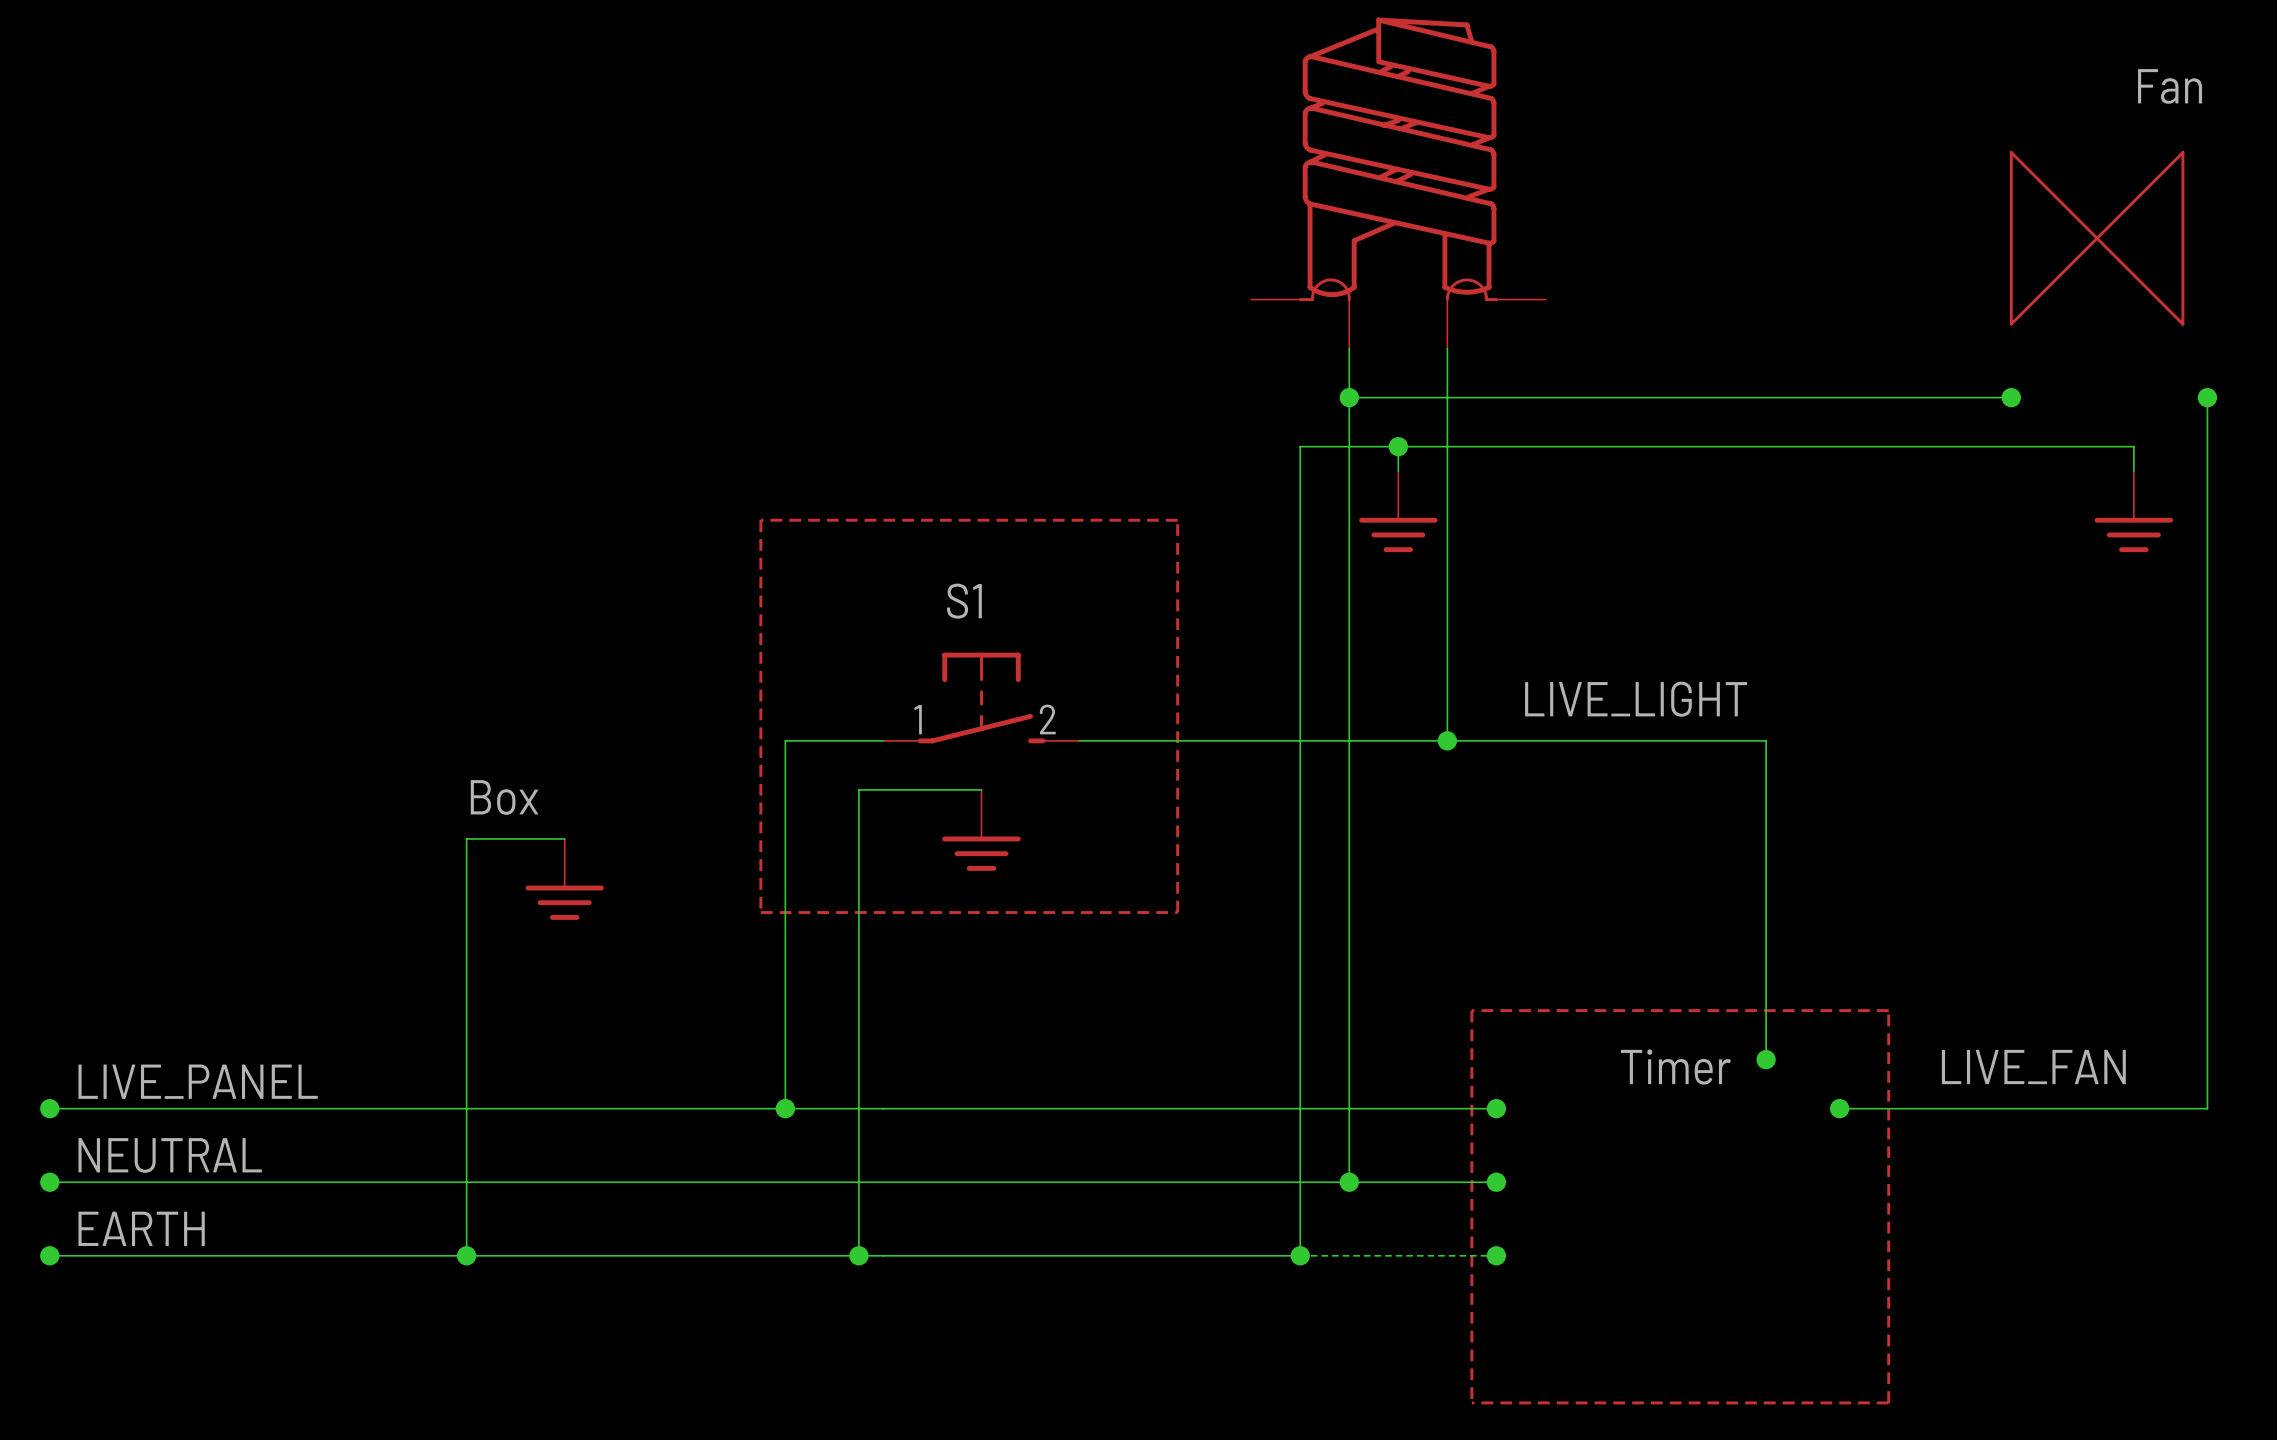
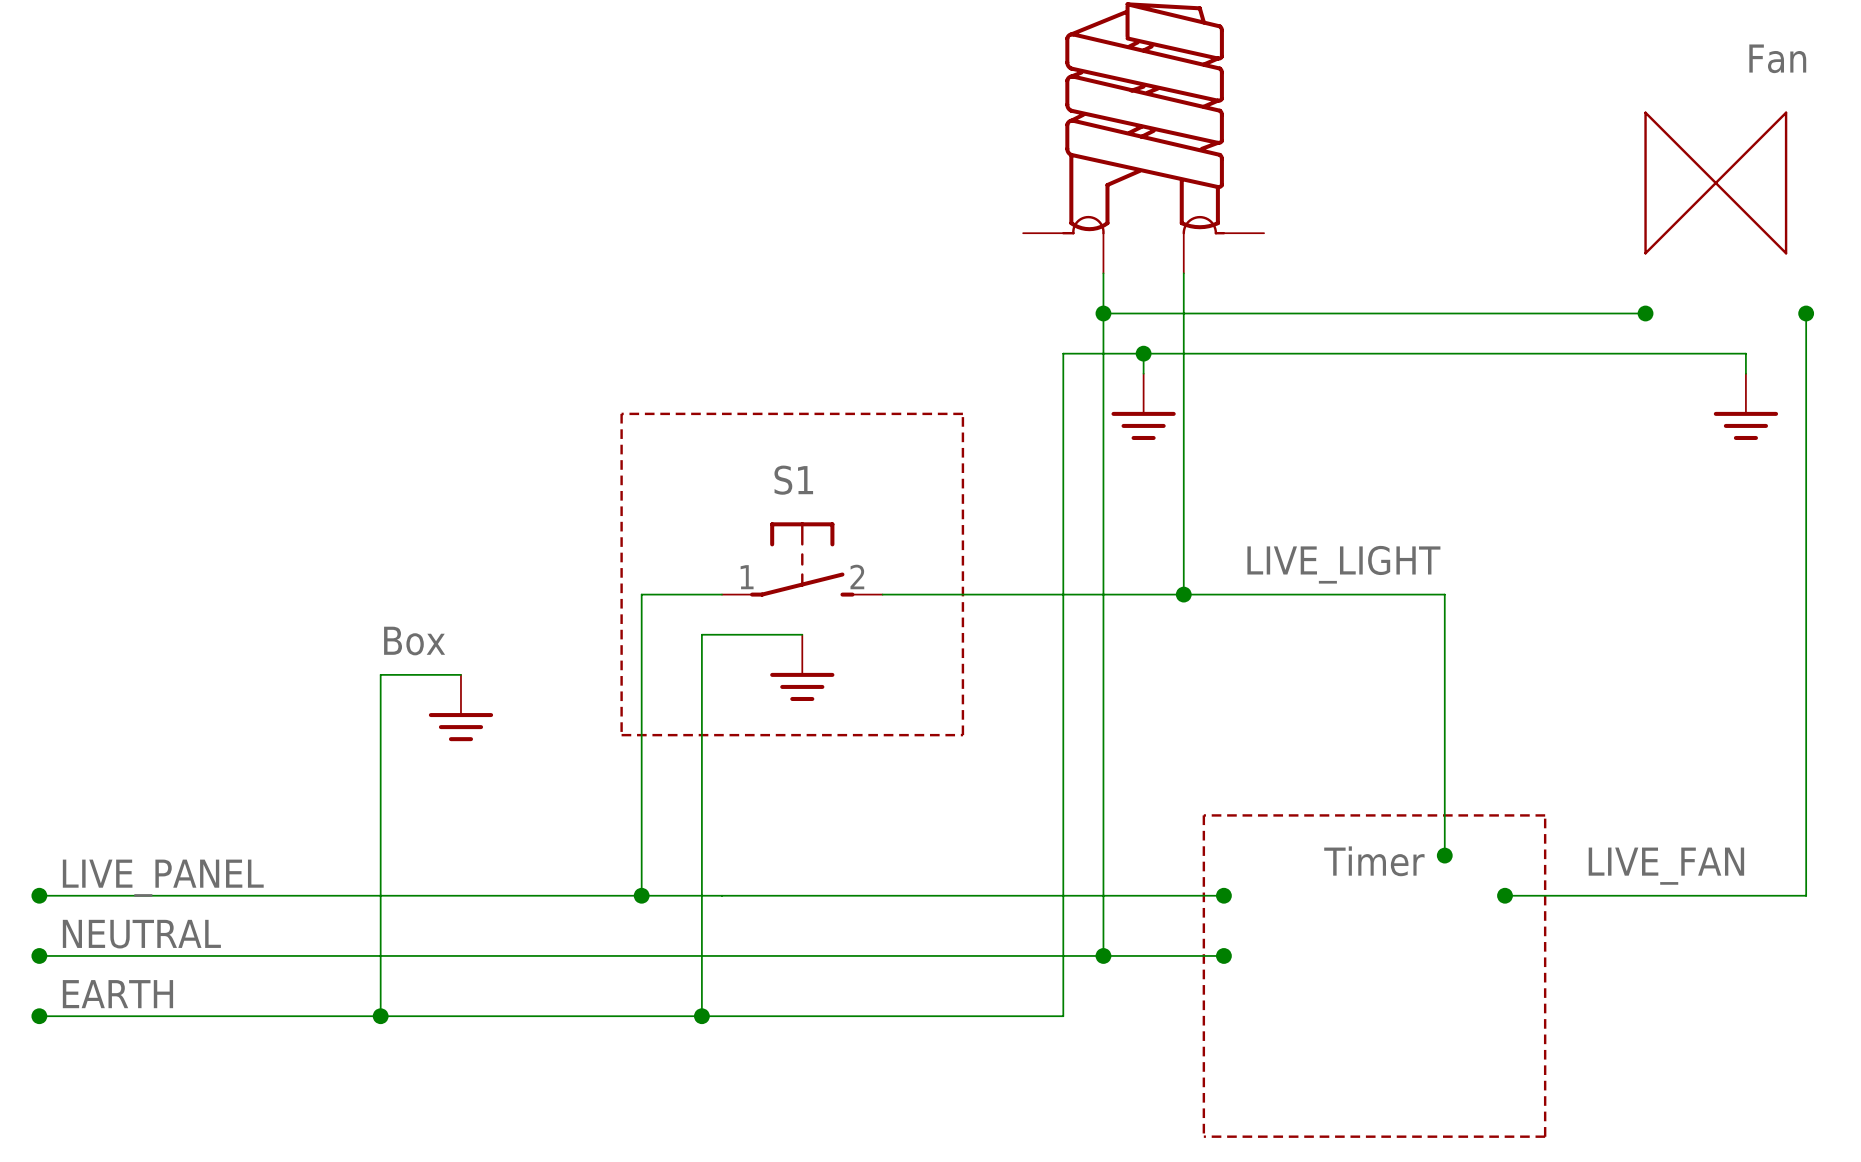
wire: (1300, 1255) (1496, 1255) -> none
junction: (1300, 1255) -> none
junction: (1496, 1255) -> none

